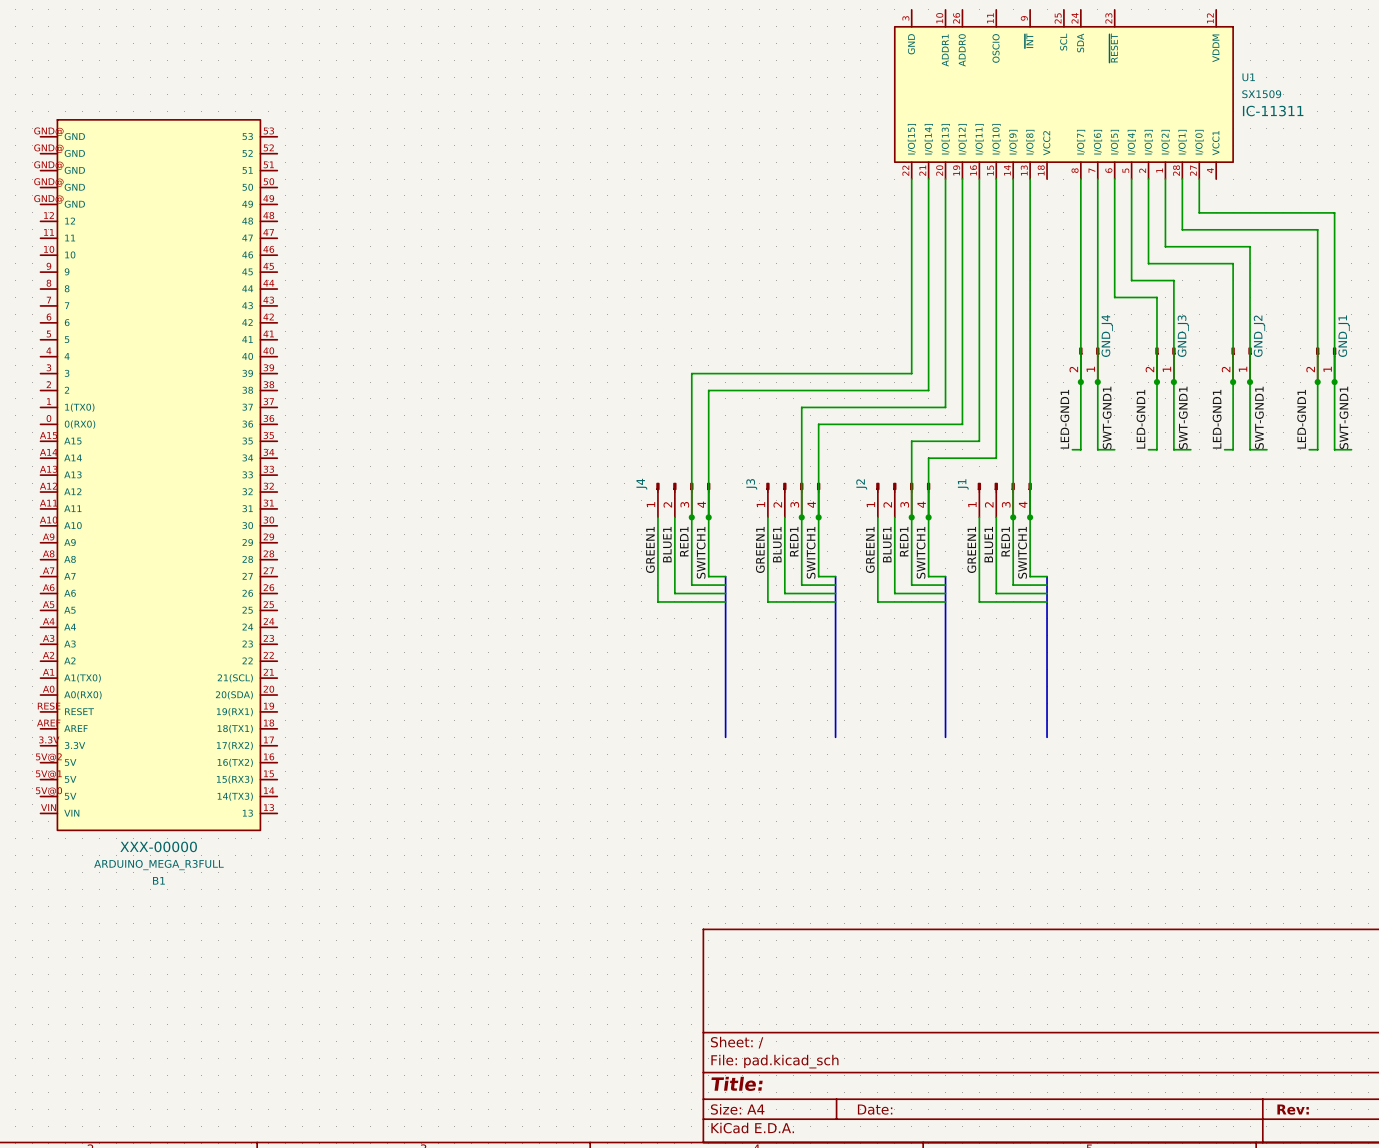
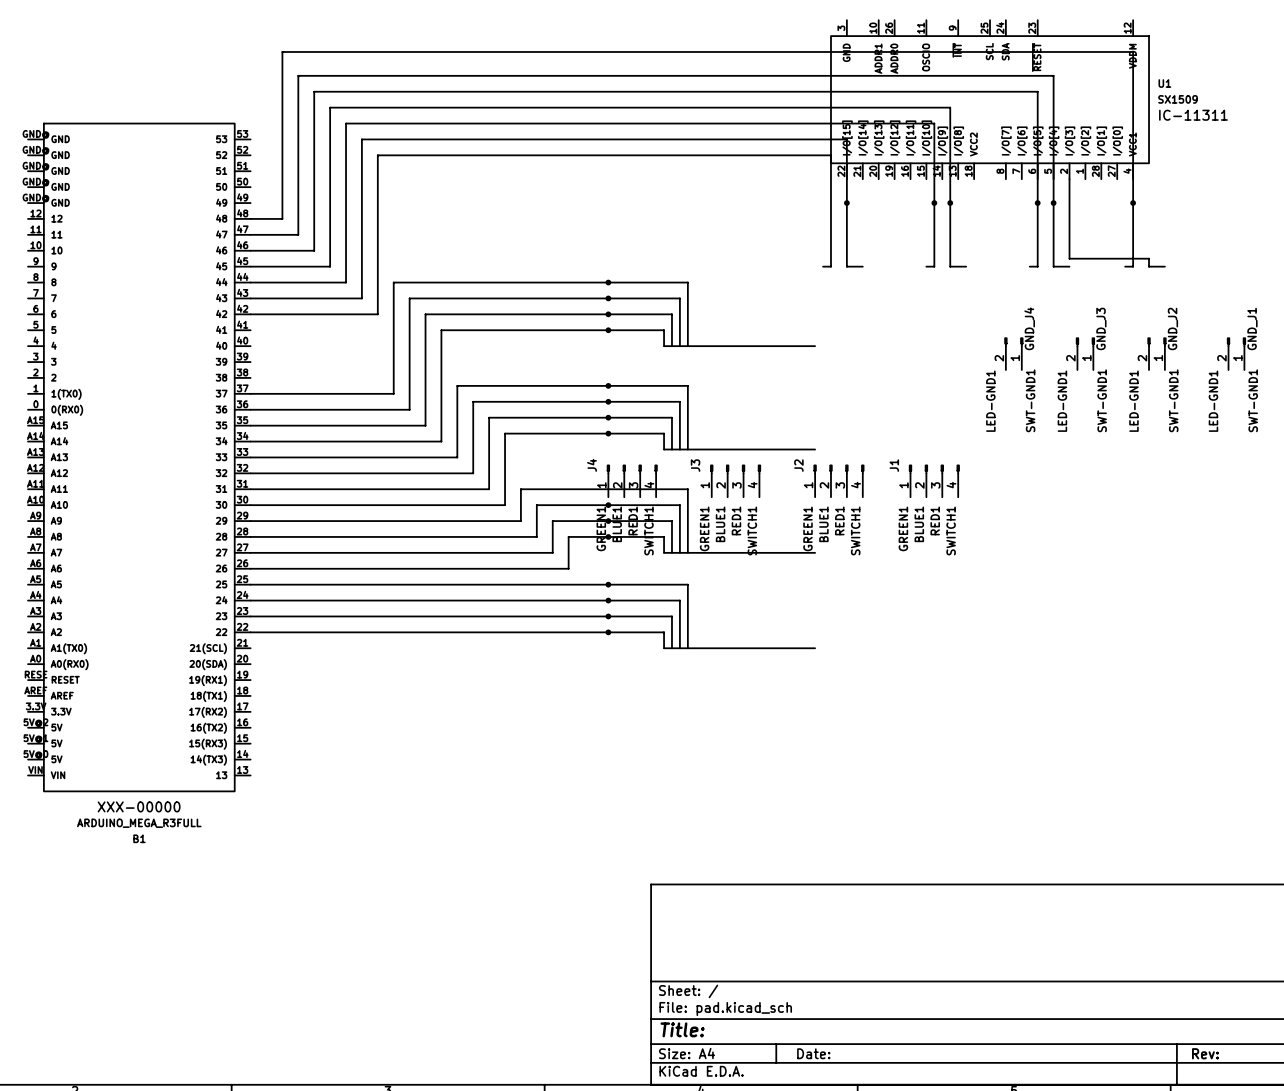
wire: none -> (846, 179) (846, 139) (361, 139) (361, 298) (250, 298)
wire: (928, 179) (928, 390) (708, 390) (708, 576) (725, 576) -> (250, 552) (552, 552) (552, 521) (671, 521) (671, 552)
wire: (945, 179) (945, 407) (801, 407) (801, 585) (835, 585) -> none
wire: (962, 179) (962, 424) (818, 424) (818, 576) (835, 576) -> none
wire: (979, 179) (979, 441) (911, 441) (911, 585) (945, 585) -> none
wire: (996, 179) (996, 458) (928, 458) (928, 576) (945, 576) -> none
wire: (1013, 179) (1013, 585) (1047, 585) -> none
wire: (1030, 179) (1030, 576) (1047, 576) -> none
wire: (1080, 179) (1080, 449) (1072, 449) -> none
wire: (1097, 179) (1097, 449) (1114, 449) -> none
wire: none -> (1037, 179) (1037, 91) (314, 91) (314, 250) (250, 250)
wire: none -> (1053, 179) (1053, 75) (298, 75) (298, 234) (250, 234)
wire: (1165, 179) (1165, 246) (1250, 246) (1250, 449) (1266, 449) -> none
wire: (1182, 179) (1182, 229) (1317, 229) (1317, 449) (1309, 449) -> none
wire: (1199, 179) (1199, 212) (1334, 212) (1334, 449) (1351, 449) -> none
junction: none -> (846, 203)
junction: none -> (934, 203)
junction: none -> (950, 203)
junction: none -> (1037, 203)
junction: none -> (1053, 203)
junction: none -> (1133, 203)
wire: none -> (250, 218) (282, 218) (282, 51) (1133, 51) (1133, 266) (1125, 266)
wire: none -> (250, 266) (330, 266) (330, 107) (950, 107) (950, 266) (966, 266)
wire: none -> (823, 266) (830, 266) (830, 155) (377, 155) (377, 314) (250, 314)
wire: (911, 272) (911, 373) (691, 373) (691, 585) (725, 585) -> (846, 266) (862, 266)
wire: none -> (926, 266) (934, 266) (934, 123) (346, 123) (346, 282) (250, 282)
wire: (1114, 272) (1114, 297) (1156, 297) (1156, 449) (1148, 449) -> (1037, 266) (1029, 266)
wire: (1131, 272) (1131, 280) (1173, 280) (1173, 449) (1190, 449) -> (1053, 266) (1069, 266)
wire: (1233, 272) (1233, 449) (1224, 449) -> (1149, 266) (1164, 266)
junction: none -> (608, 282)
junction: none -> (608, 298)
junction: none -> (608, 314)
junction: none -> (608, 330)
wire: none -> (664, 346) (664, 330) (441, 330) (441, 441) (250, 441)
bus: none -> (664, 346) (815, 346)
wire: none -> (671, 346) (671, 314) (425, 314) (425, 425) (250, 425)
wire: none -> (679, 346) (679, 298) (409, 298) (409, 409) (250, 409)
wire: none -> (687, 346) (687, 282) (393, 282) (393, 393) (250, 393)
junction: (1080, 382) -> none
junction: (1097, 382) -> none
junction: (1156, 382) -> none
junction: (1173, 382) -> none
junction: (1233, 382) -> none
junction: (1250, 382) -> none
junction: (1317, 382) -> none
junction: (1334, 382) -> none
junction: none -> (608, 385)
junction: none -> (608, 401)
junction: none -> (608, 417)
junction: none -> (608, 433)
wire: none -> (664, 449) (664, 433) (505, 433) (505, 505) (250, 505)
bus: none -> (664, 449) (815, 449)
wire: none -> (671, 449) (671, 417) (489, 417) (489, 489) (250, 489)
wire: none -> (679, 449) (679, 401) (473, 401) (473, 473) (250, 473)
wire: none -> (687, 449) (687, 385) (457, 385) (457, 457) (250, 457)
wire: (657, 517) (657, 601) (725, 601) -> none
wire: (674, 517) (674, 593) (725, 593) -> none
junction: (691, 517) -> none
junction: (708, 517) -> none
wire: (767, 517) (767, 601) (835, 601) -> none
wire: (784, 517) (784, 593) (835, 593) -> none
junction: (801, 517) -> none
junction: (818, 517) -> none
wire: (877, 517) (877, 601) (945, 601) -> none
wire: (894, 517) (894, 593) (945, 593) -> none
junction: (911, 517) -> none
junction: (928, 517) -> none
wire: (979, 517) (979, 601) (1047, 601) -> none
wire: (996, 517) (996, 593) (1047, 593) -> none
junction: (1013, 517) -> none
junction: (1030, 517) -> none
junction: none -> (608, 505)
wire: none -> (250, 521) (520, 521) (520, 489) (687, 489) (687, 552)
junction: none -> (608, 521)
wire: none -> (250, 536) (536, 536) (536, 505) (679, 505) (679, 552)
junction: none -> (608, 536)
wire: none -> (664, 552) (664, 536) (568, 536) (568, 568) (250, 568)
bus: none -> (664, 552) (815, 552)
bus: (725, 576) (725, 737) -> none
bus: (835, 576) (835, 737) -> none
bus: (945, 576) (945, 737) -> none
bus: (1047, 576) (1047, 737) -> none
wire: none -> (250, 584) (687, 584) (687, 648)
junction: none -> (608, 584)
wire: none -> (250, 600) (679, 600) (679, 648)
junction: none -> (608, 600)
wire: none -> (250, 616) (671, 616) (671, 648)
junction: none -> (608, 616)
wire: none -> (250, 632) (664, 632) (664, 648)
junction: none -> (608, 632)
bus: none -> (664, 648) (815, 648)

